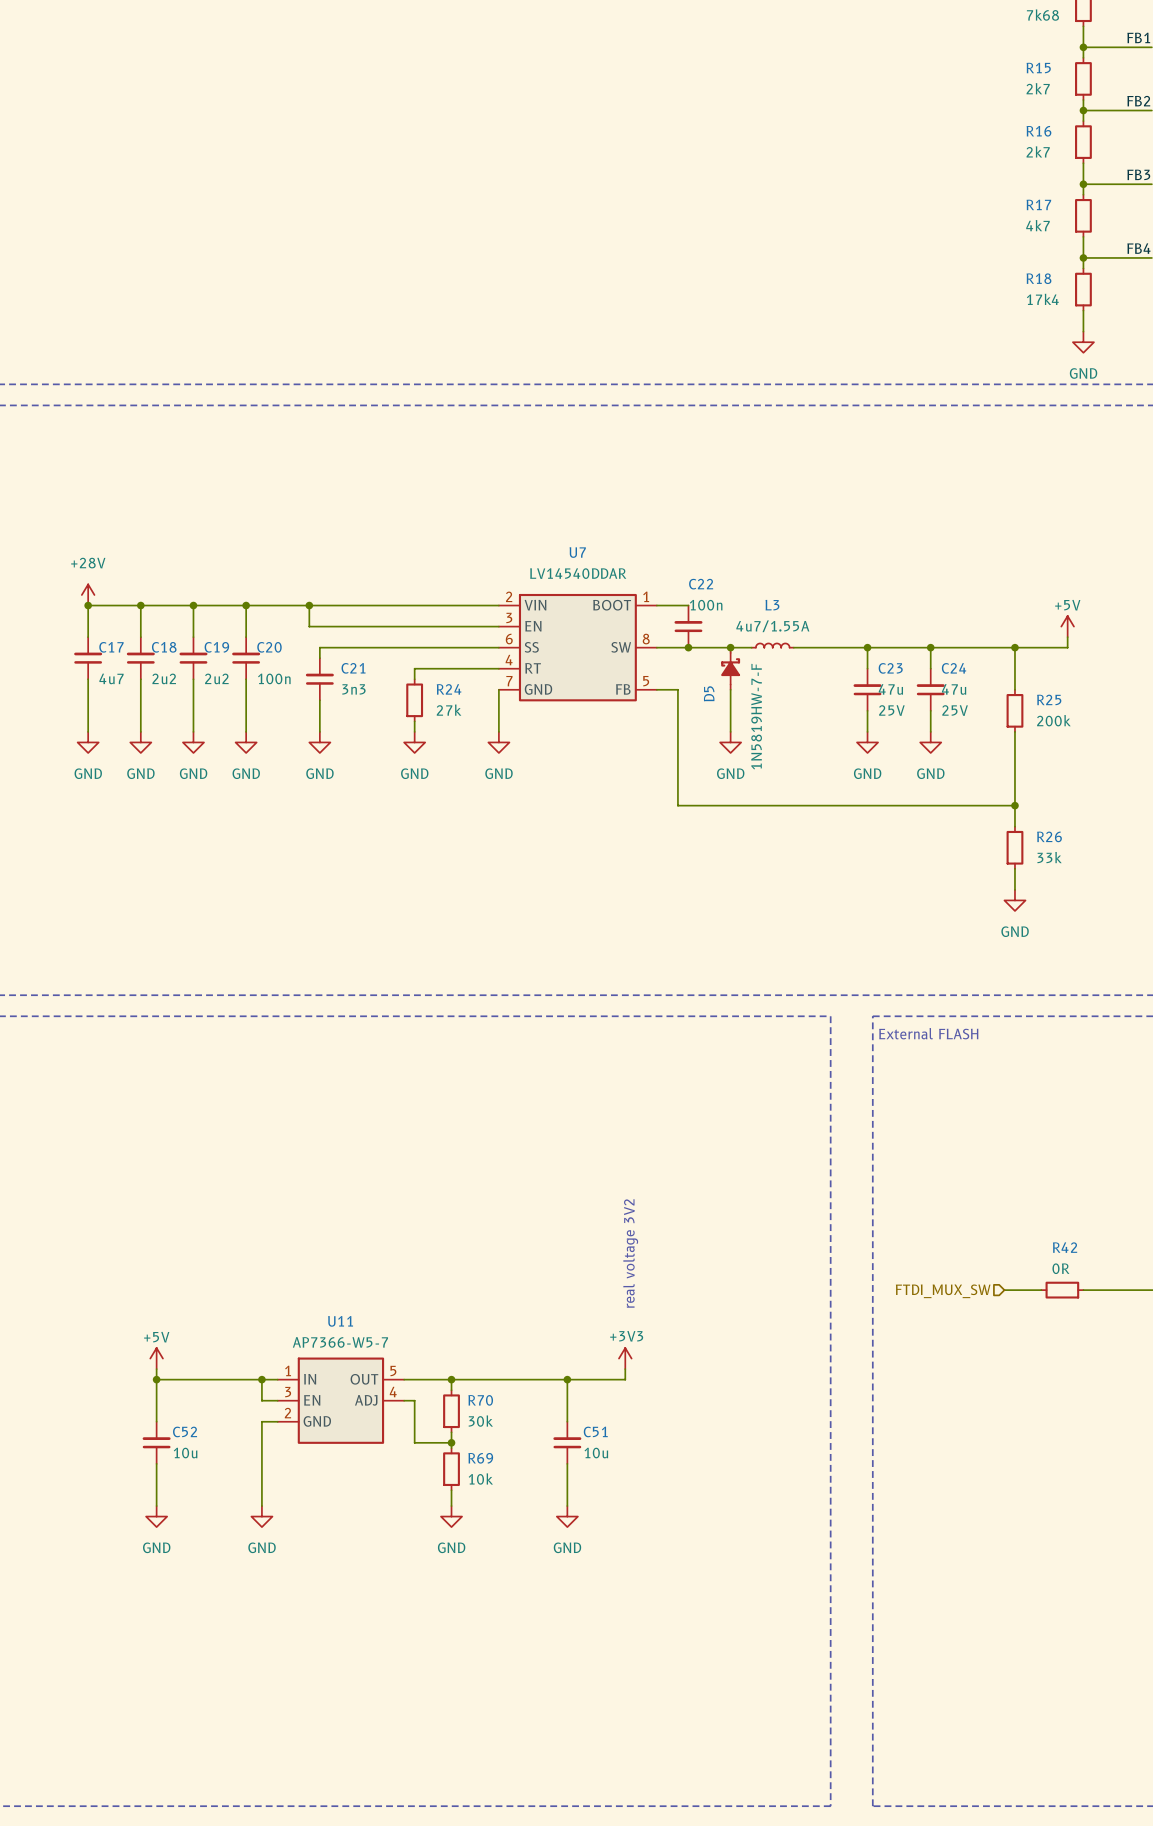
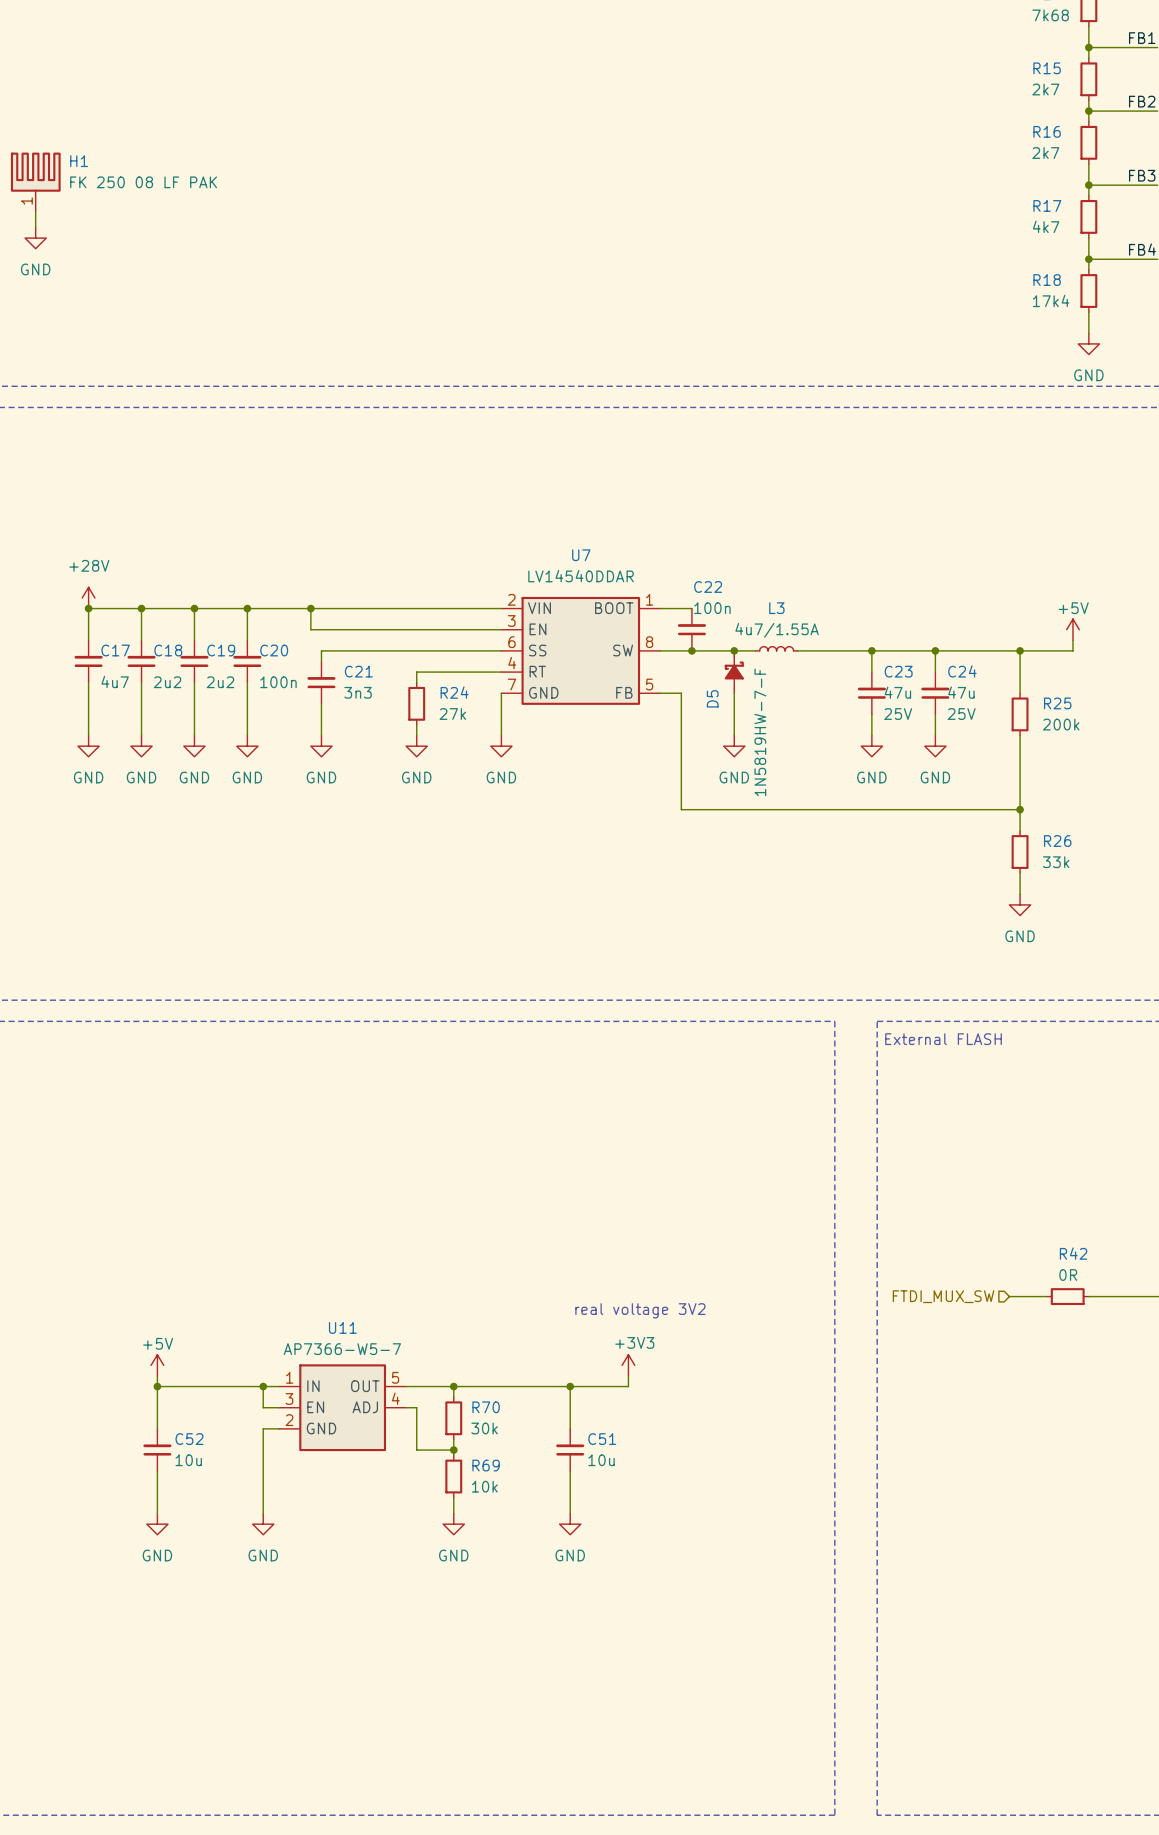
H1: none -> (35, 182)
wire: none -> (35, 211) (35, 227)
power symbol: none -> GND (35, 238)
text rotation: 0° (630, 1253) -> 90° clockwise (640, 1310)

